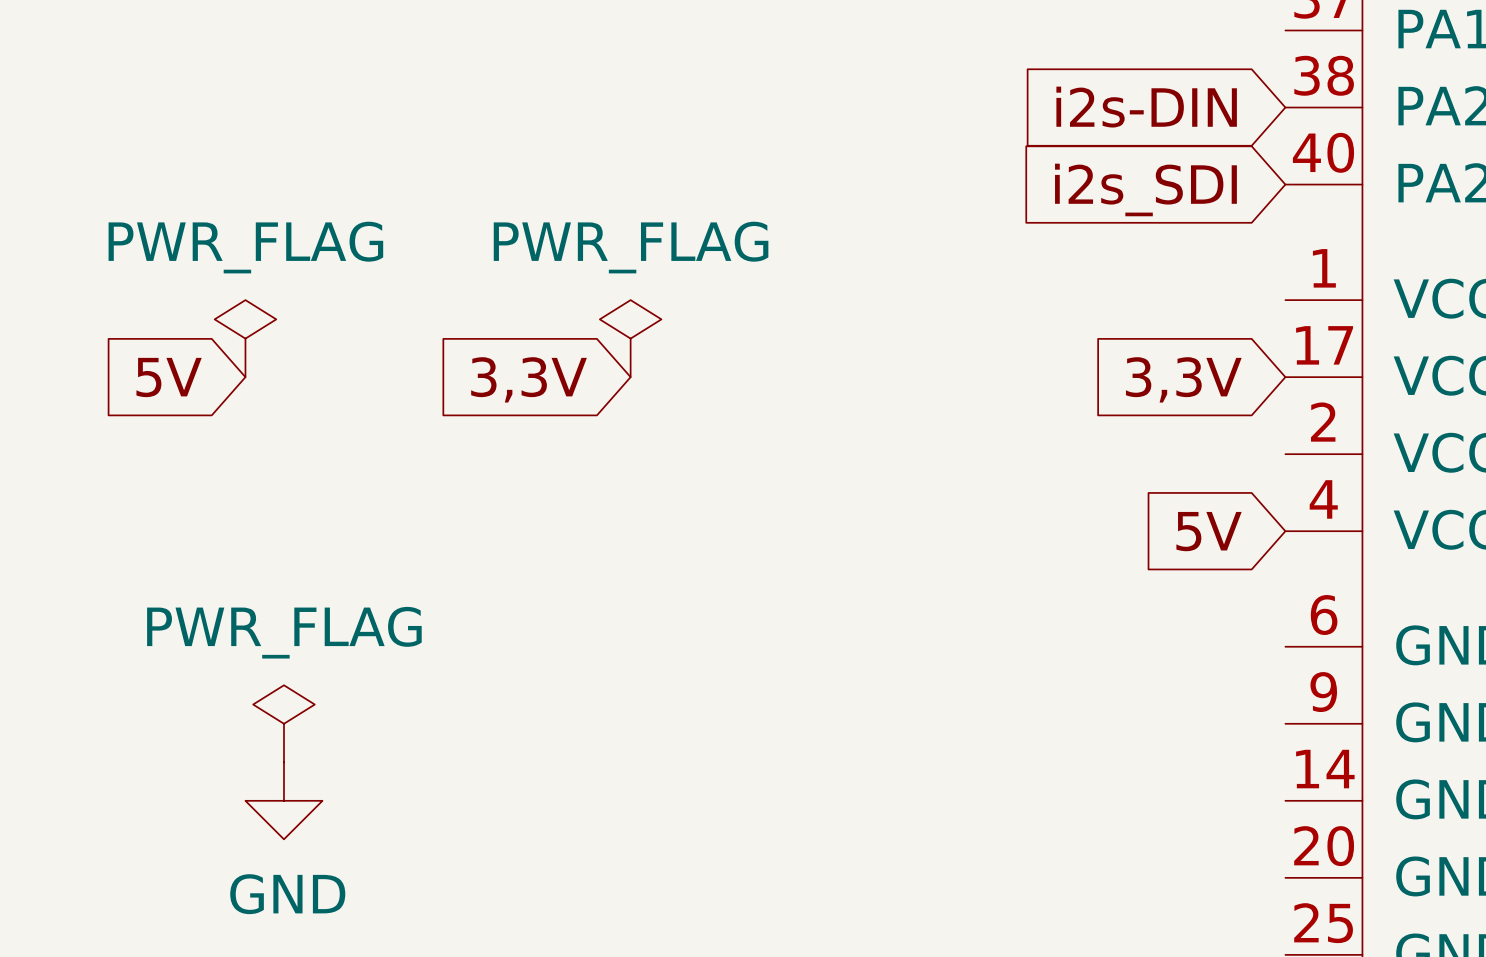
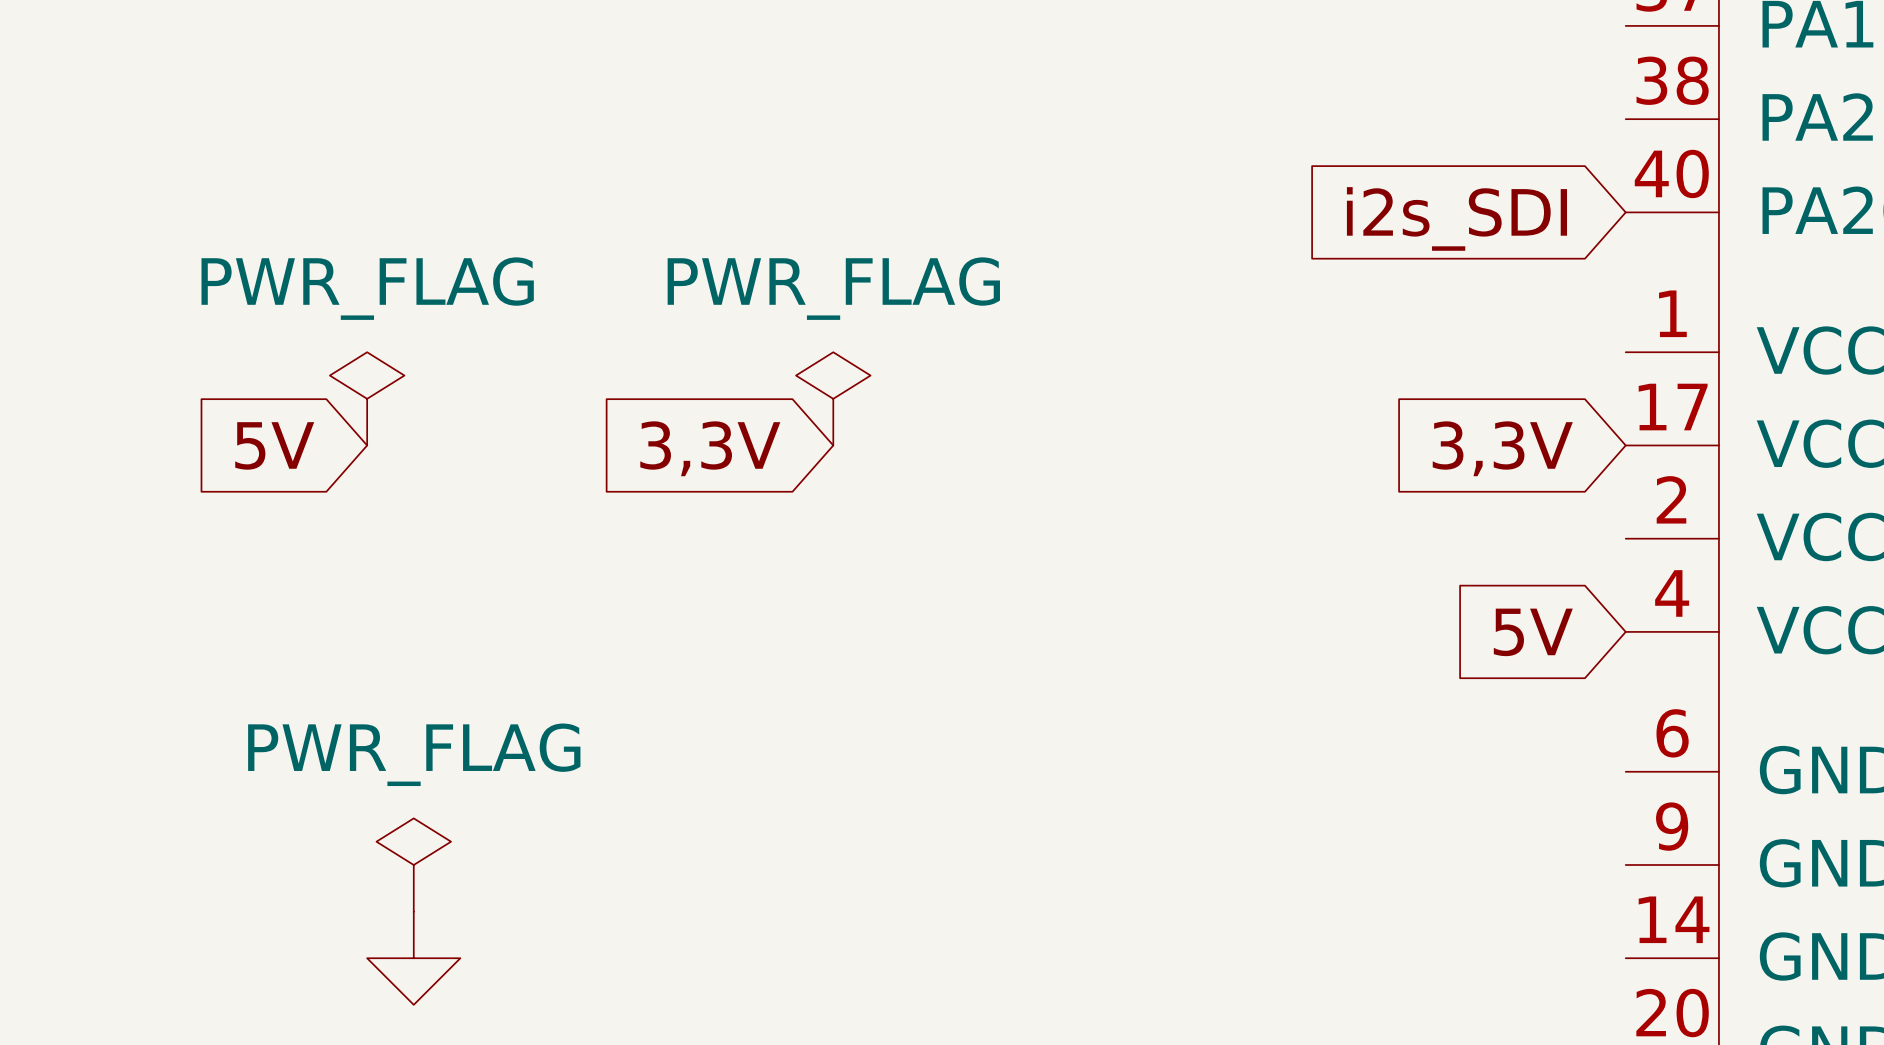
global label: i2s-DIN (1146, 107) -> none

